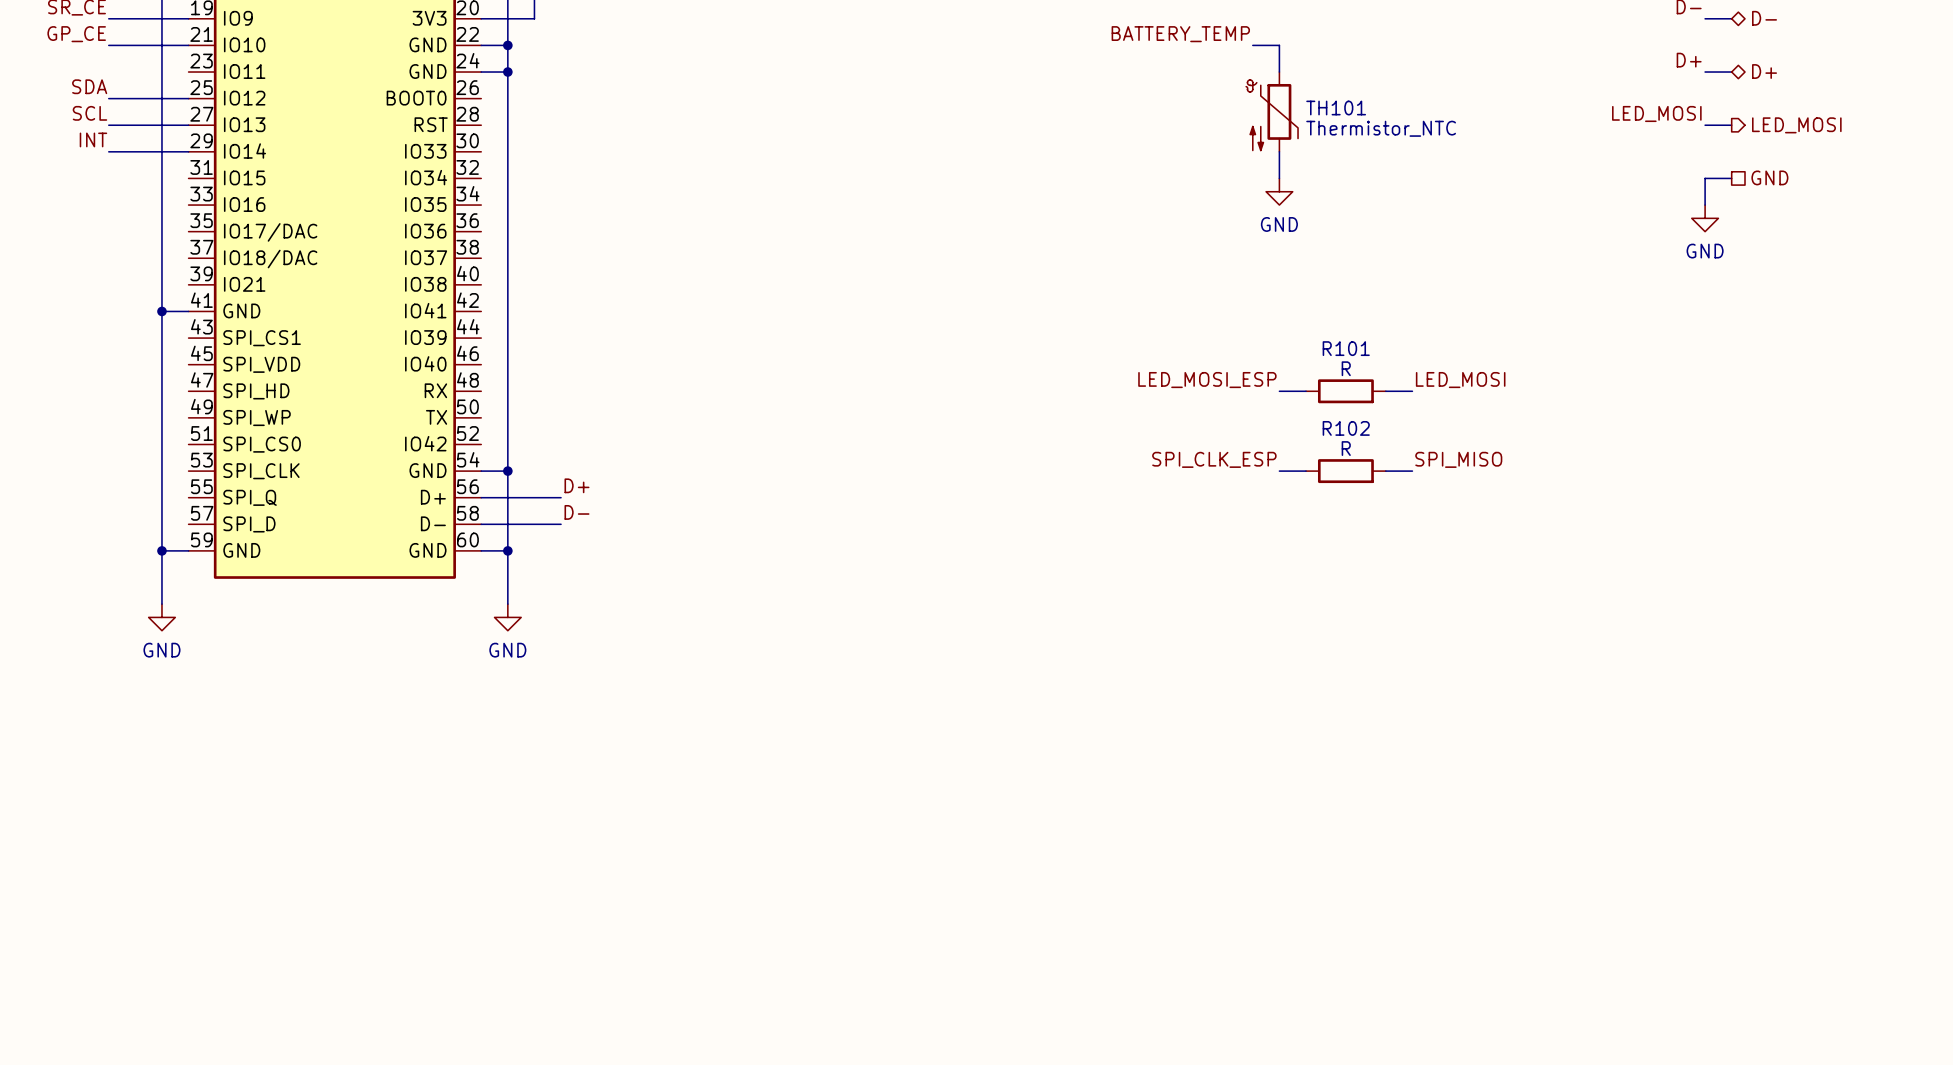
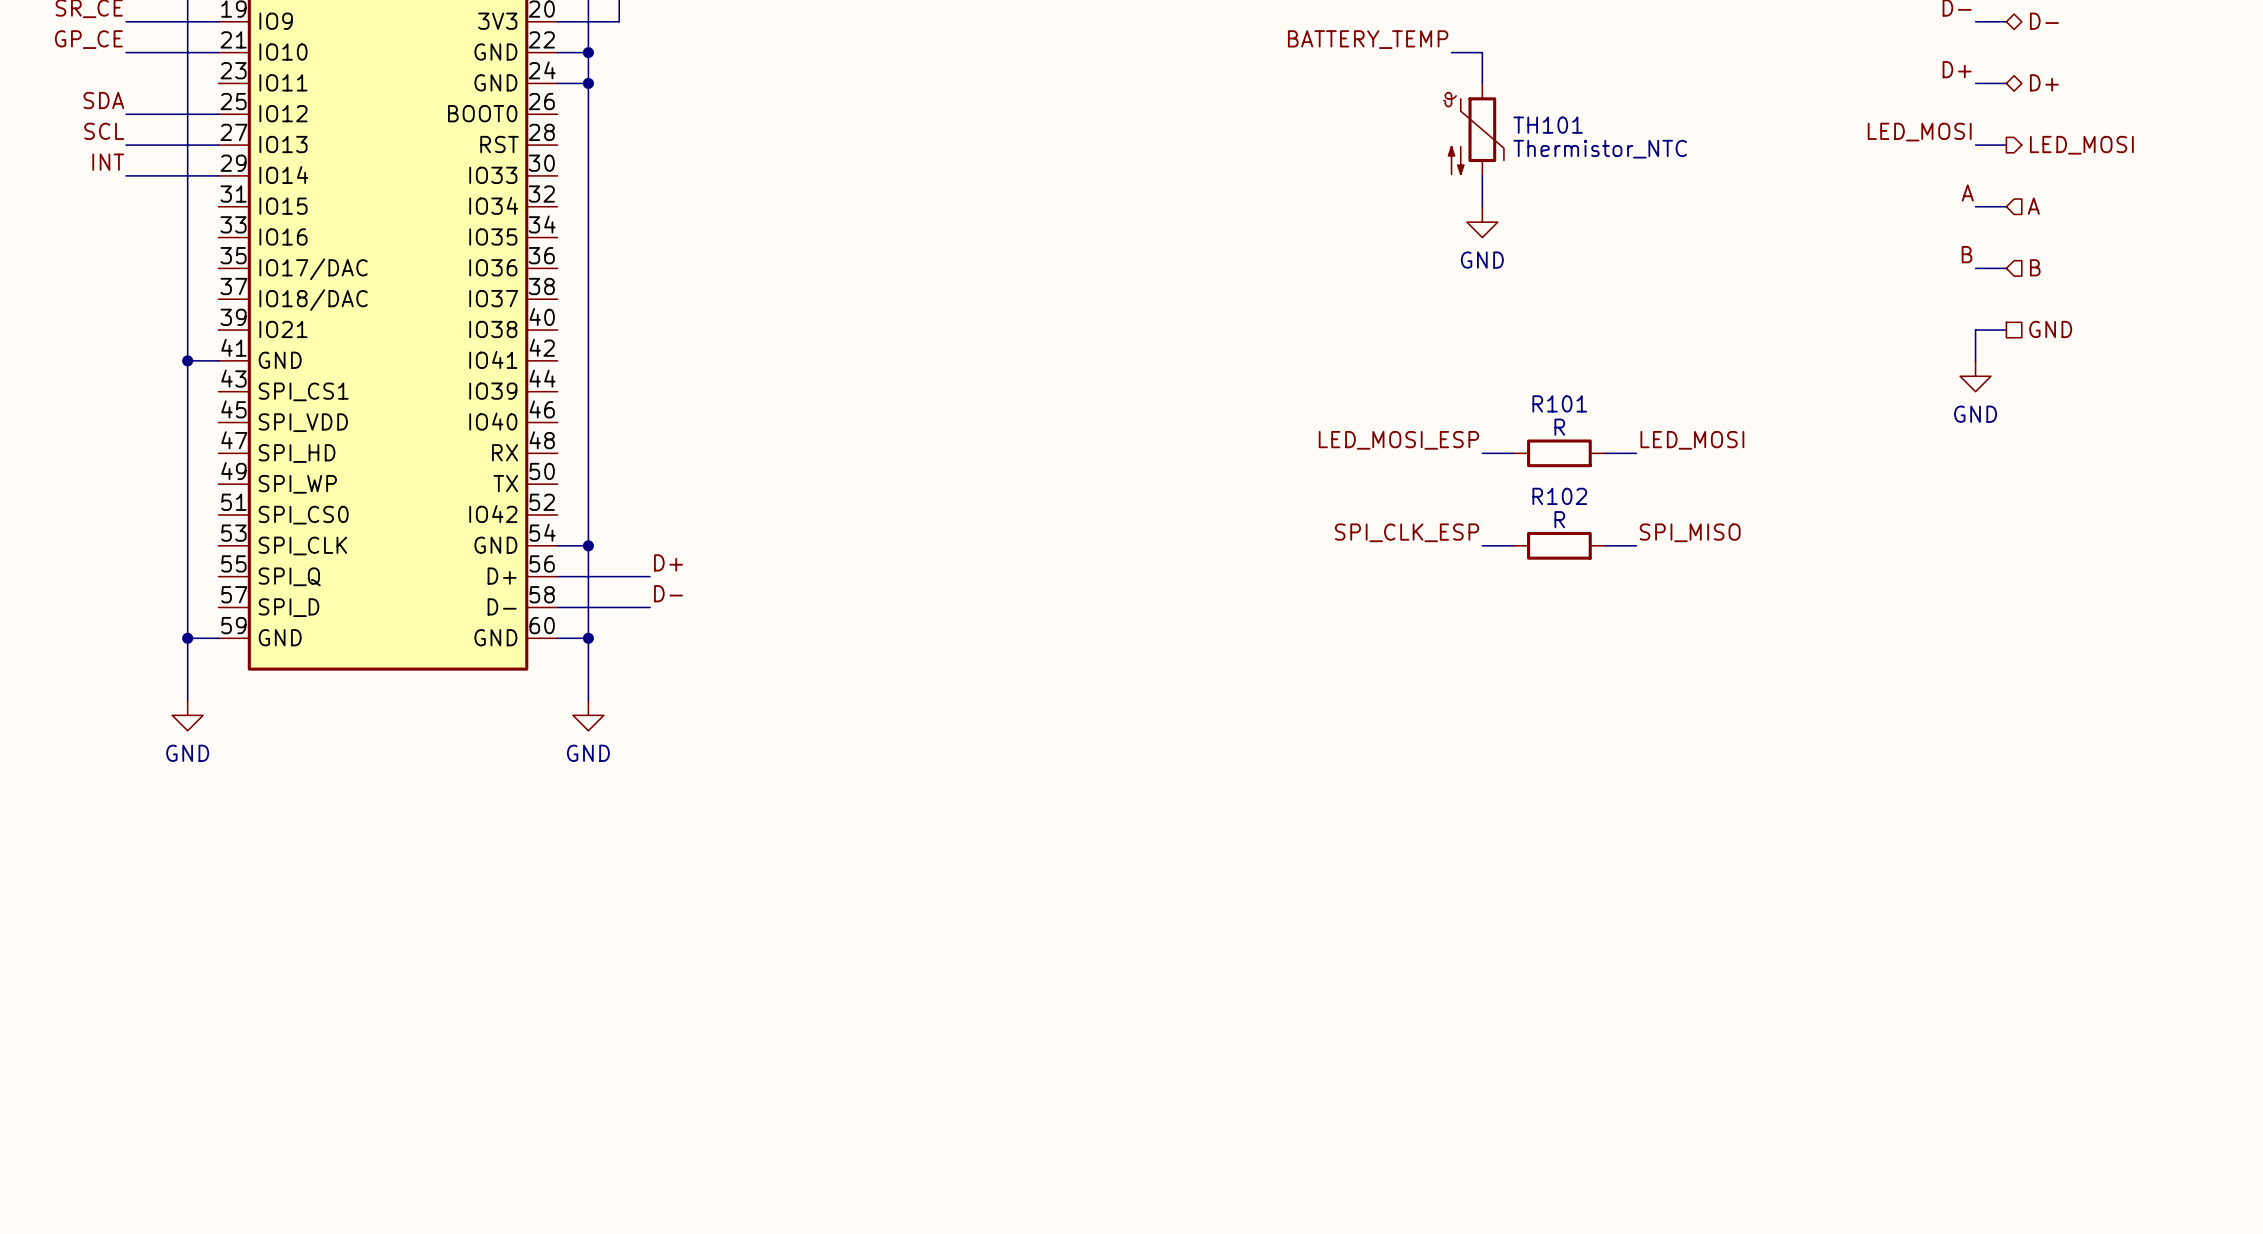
label: none -> A (1967, 192)
hierarchical label shape: passive (1769, 177) -> input (2033, 206)
hierarchical label: GND (1769, 177) -> A (2033, 206)
wire: (1705, 178) (1705, 205) -> none
power symbol position: GND (1705, 218) -> GND (1975, 376)
label: none -> B (1967, 254)
wire: none -> (1975, 268) (2006, 268)
hierarchical label: none -> B (2035, 267)
wire: none -> (2006, 330) (1975, 330) (1975, 360)
hierarchical label: none -> GND (2050, 329)

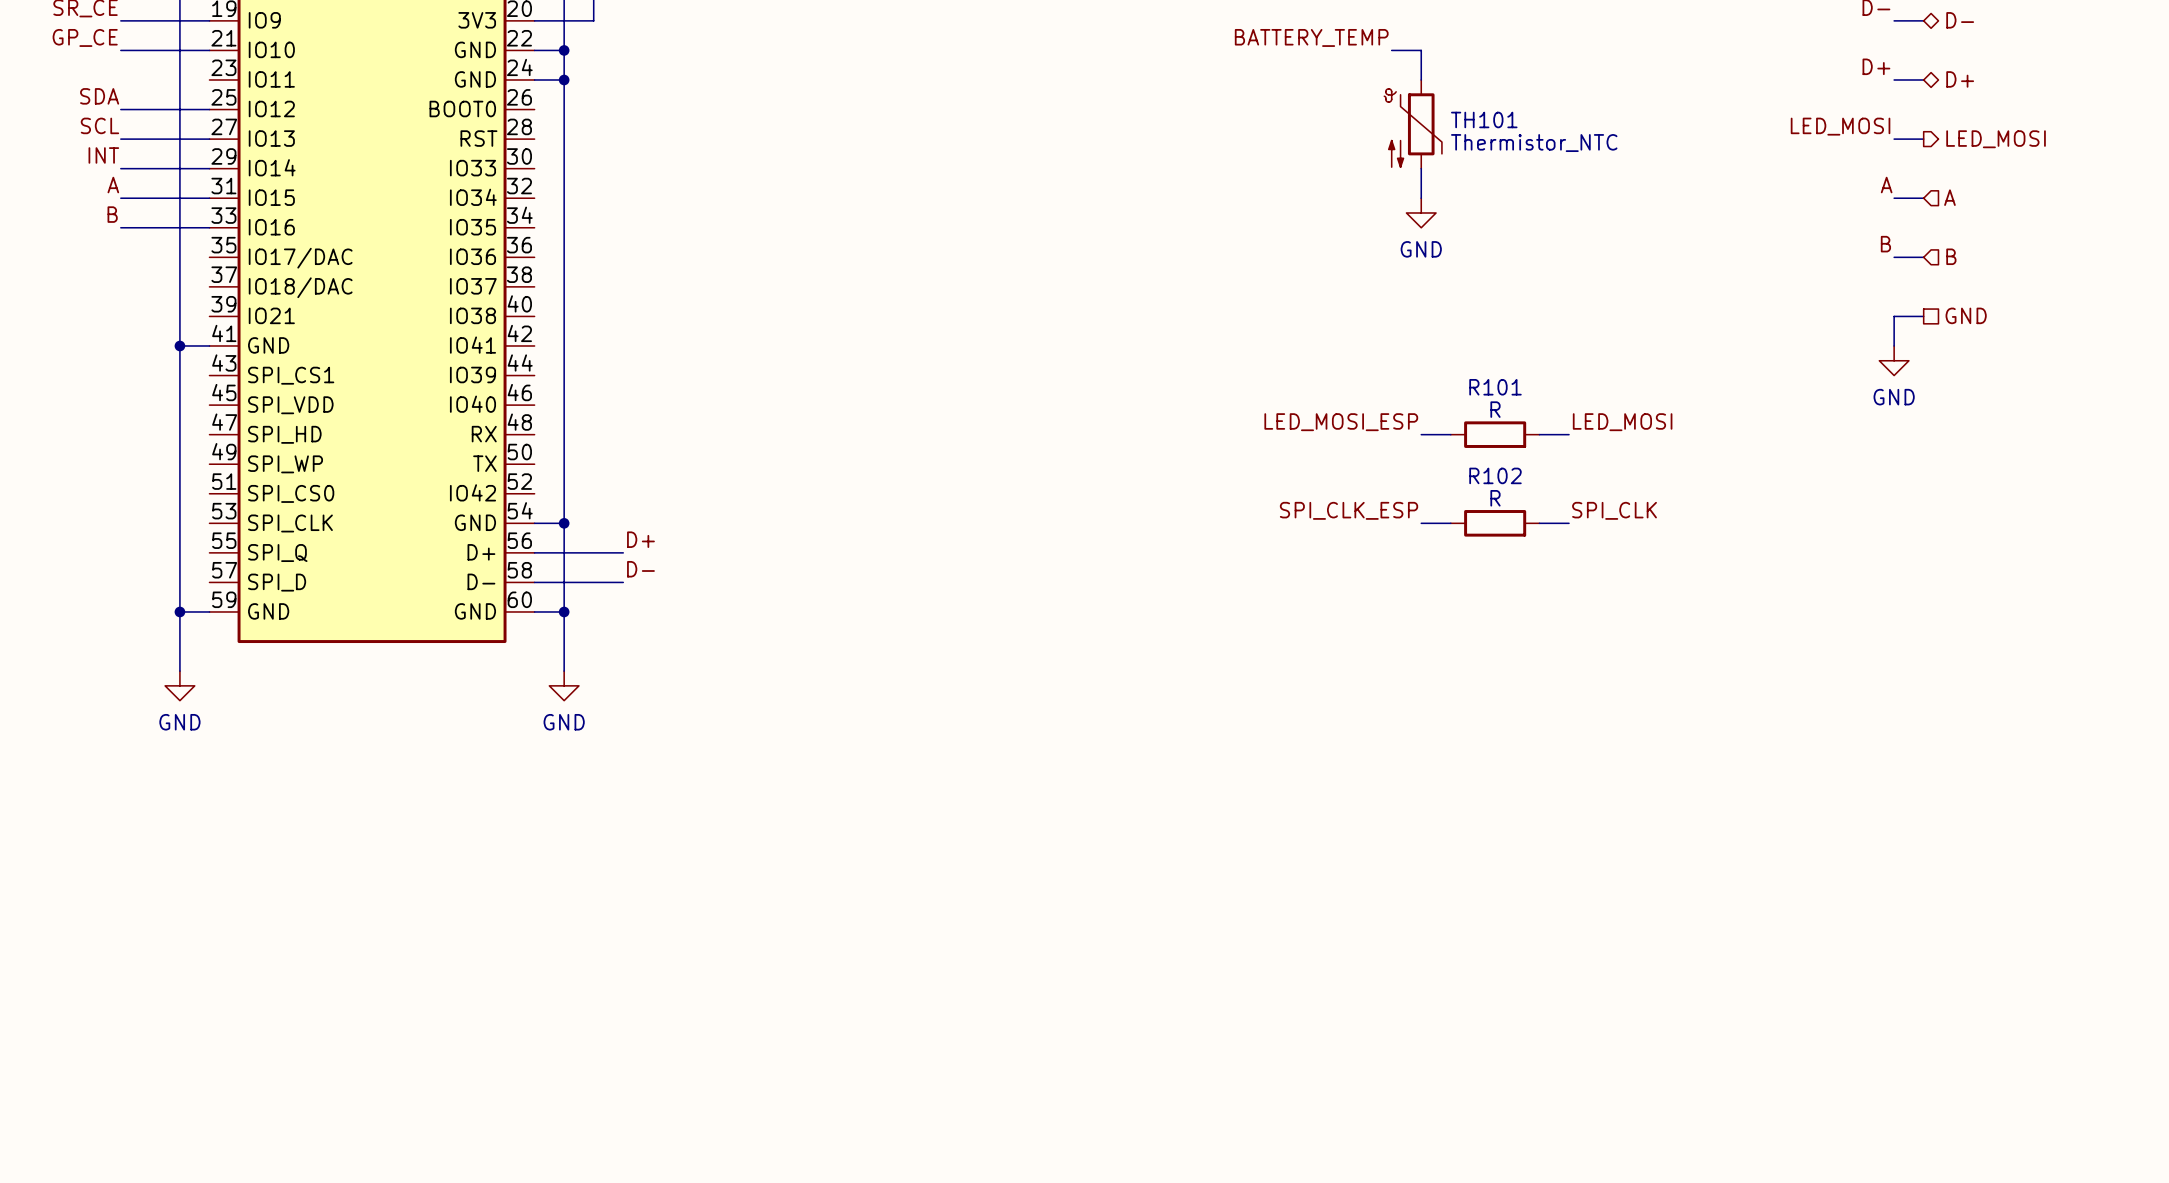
label: none -> A (113, 185)
wire: none -> (120, 198) (209, 198)
label: none -> B (112, 214)
wire: none -> (120, 227) (209, 227)
label: SPI_MISO (1690, 532) -> SPI_CLK (1614, 510)

